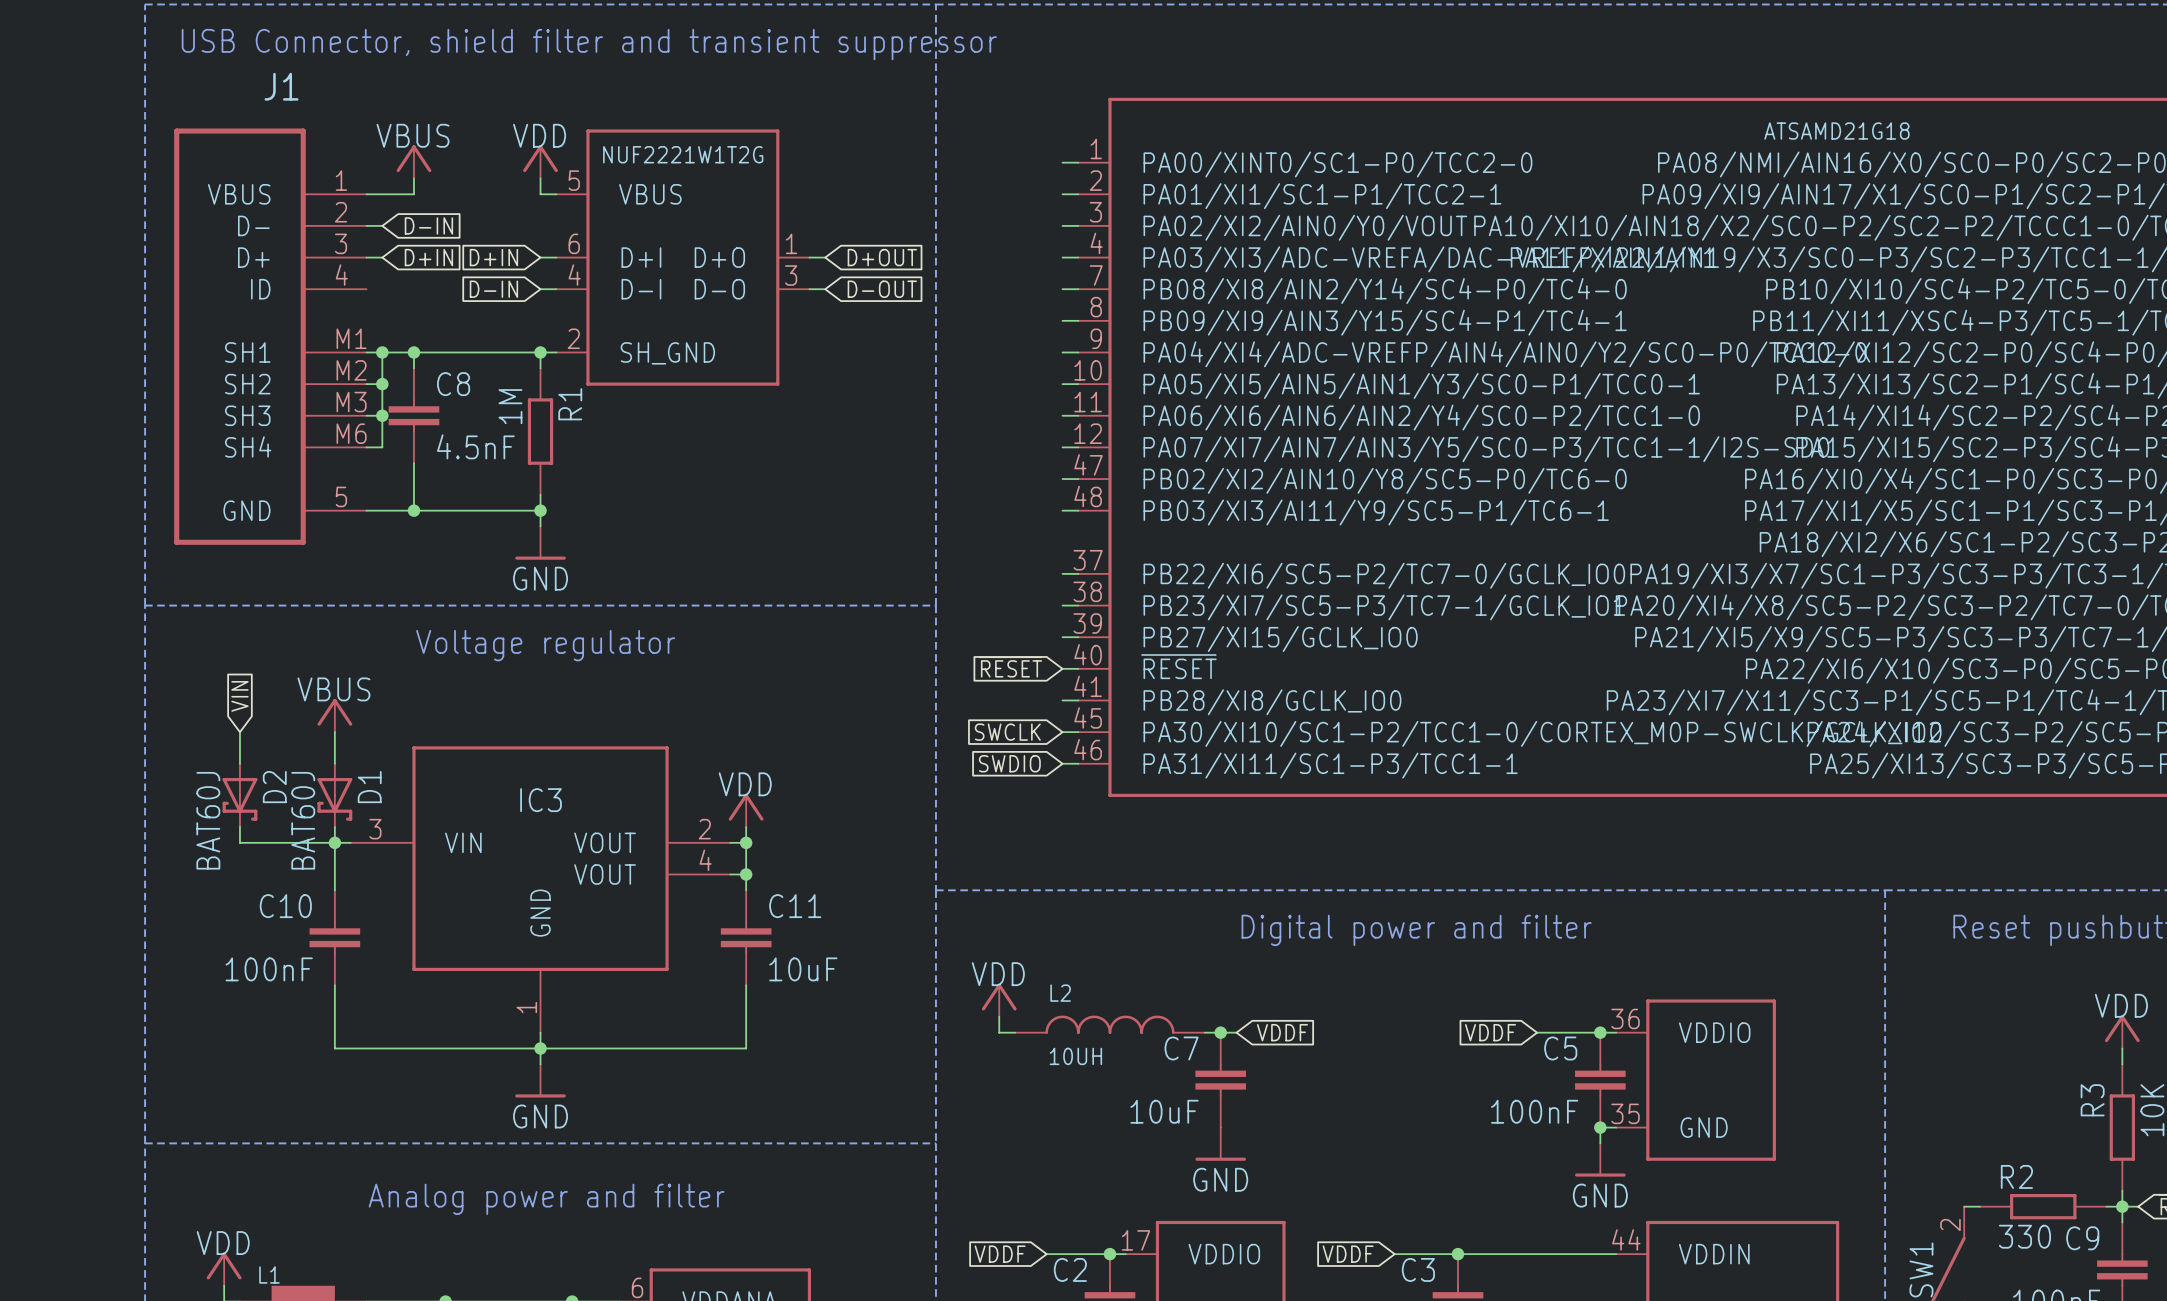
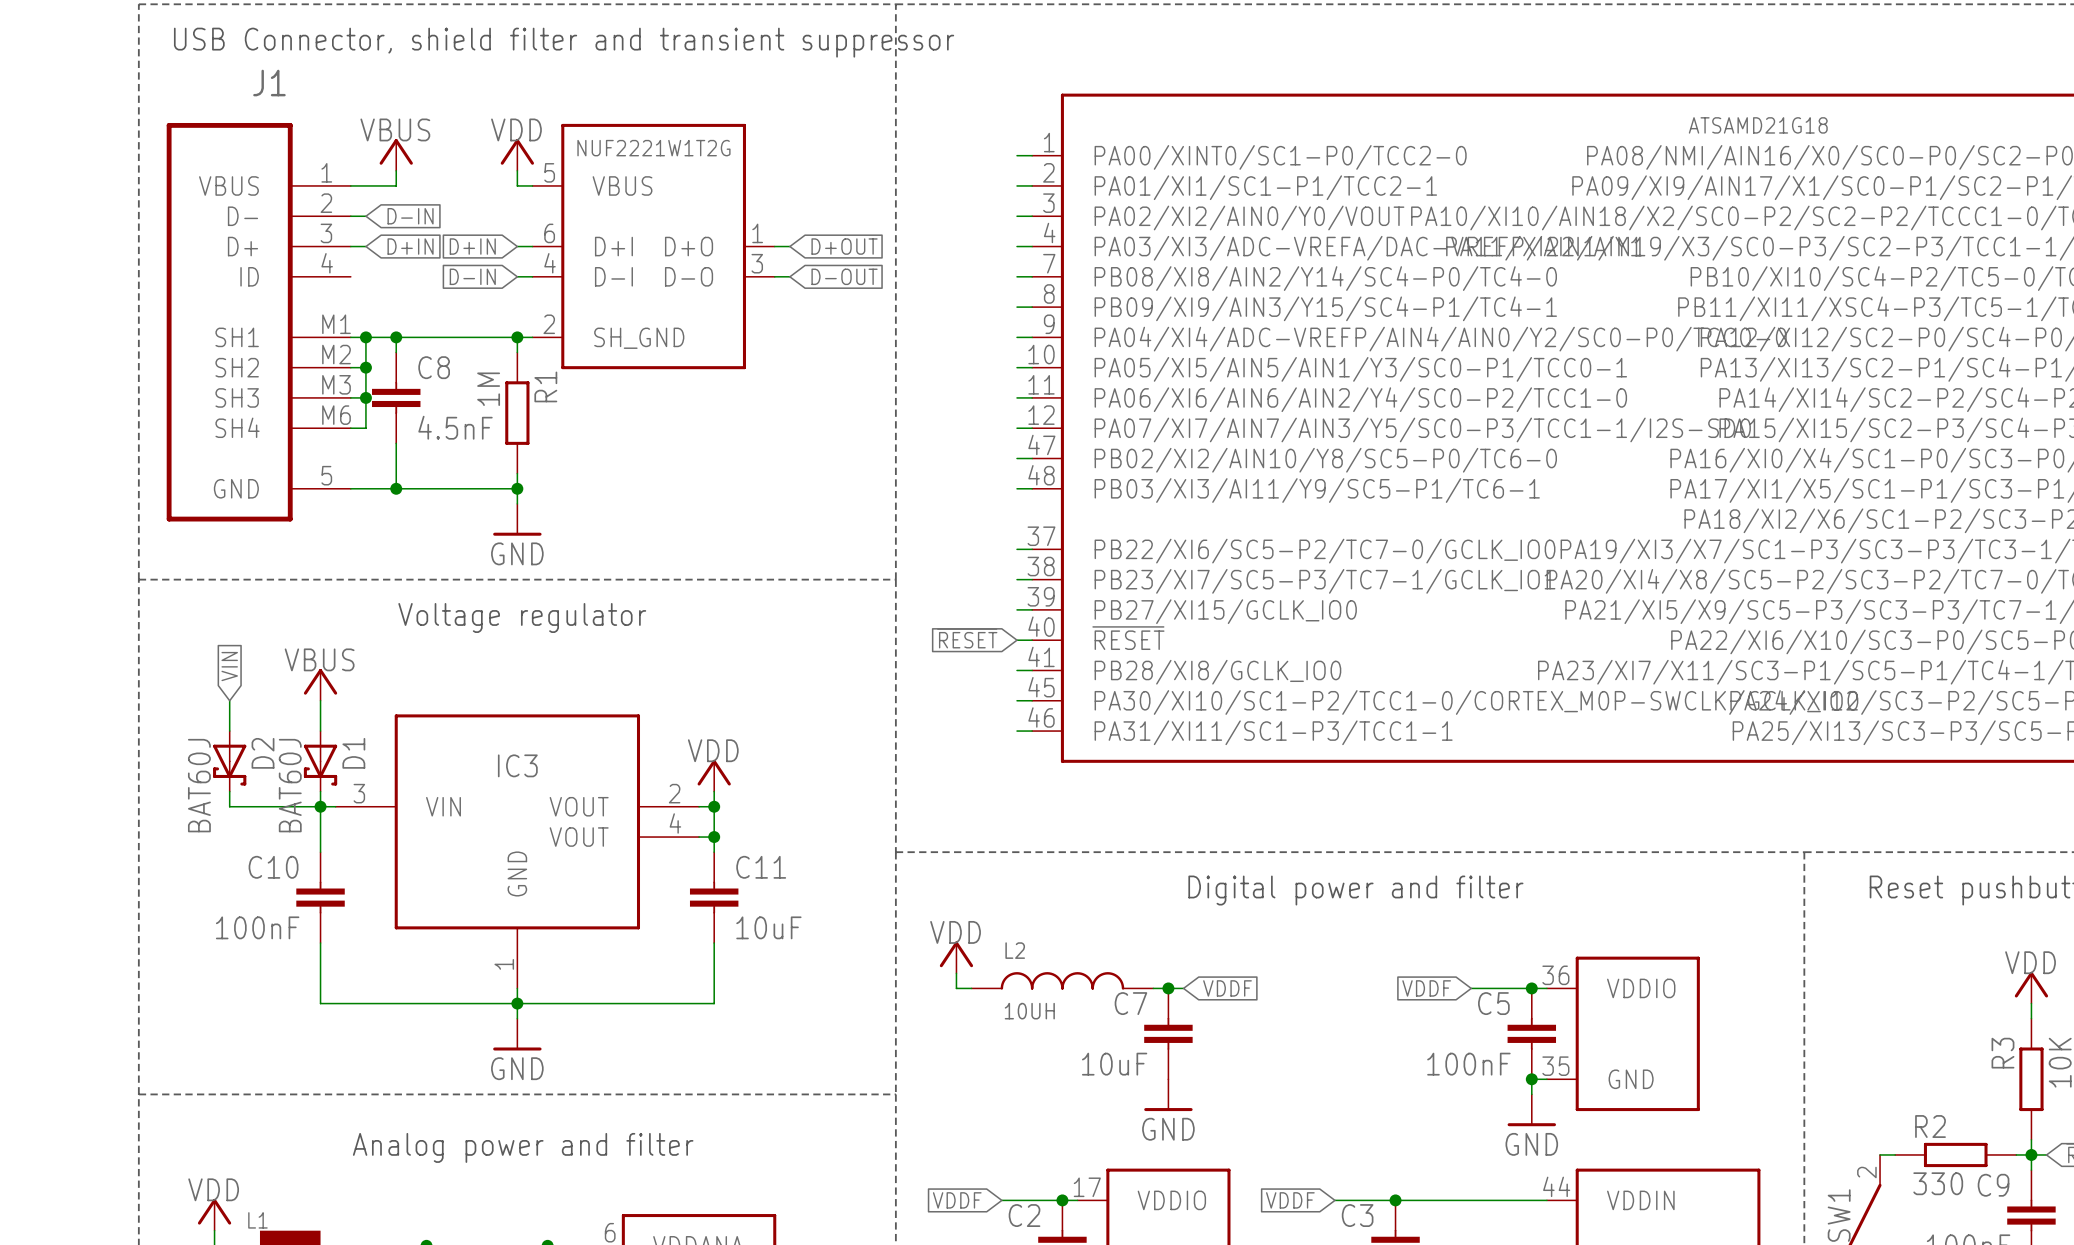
global label: SWCLK (1007, 732) -> none
global label: SWDIO (1009, 763) -> none

